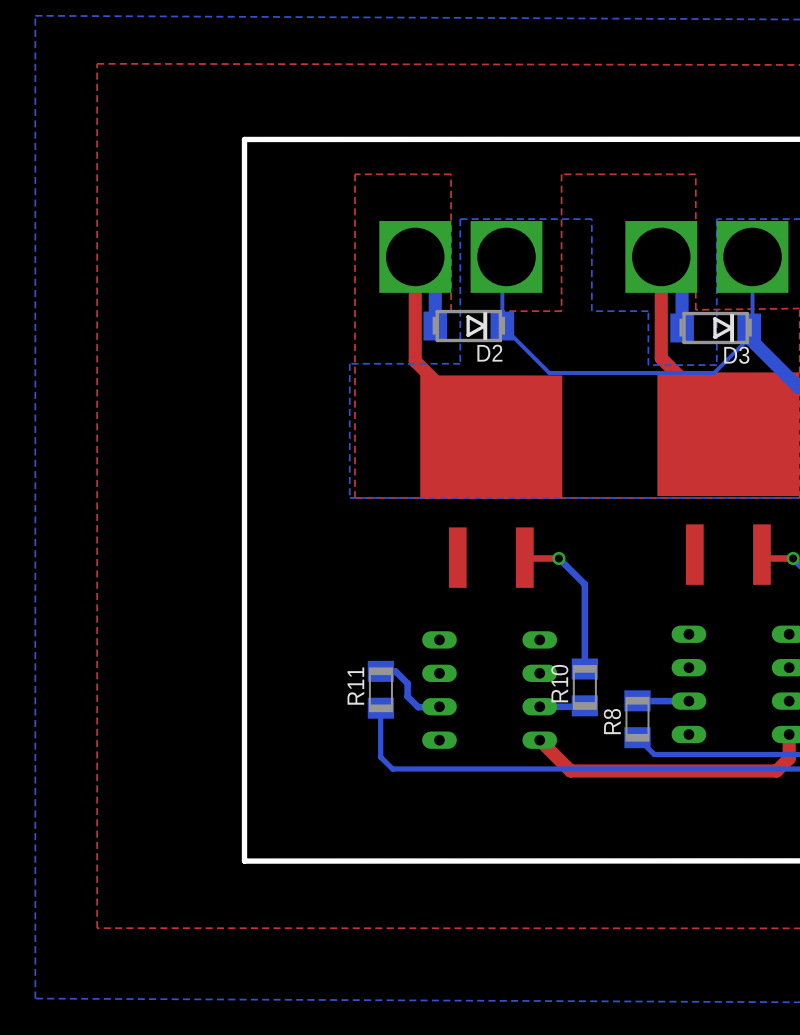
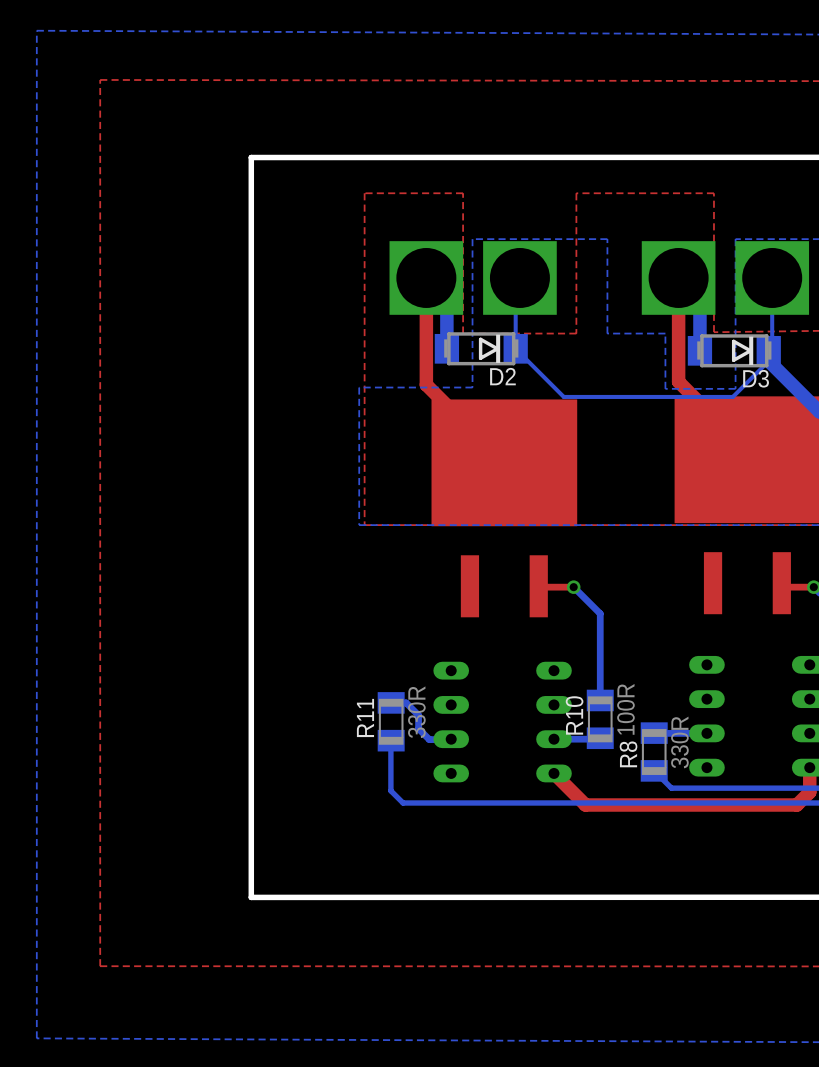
R10 value: none -> 100R (625, 709)
R11 value: none -> 330R (416, 712)
R8 value: none -> 330R (679, 742)

